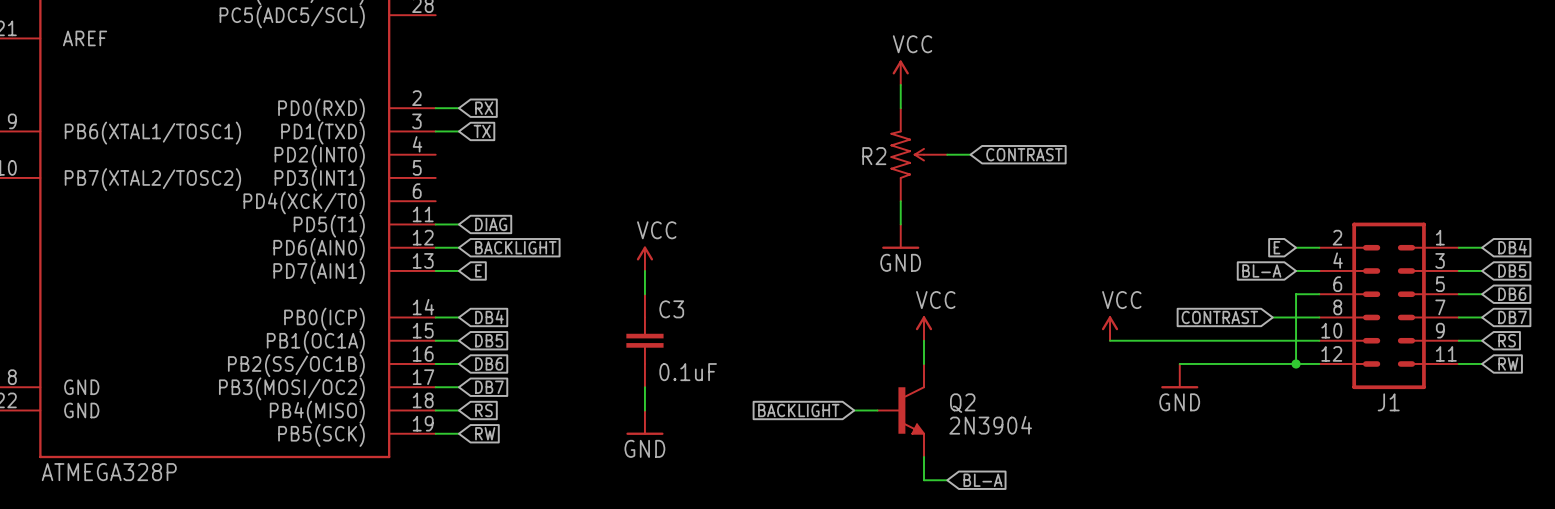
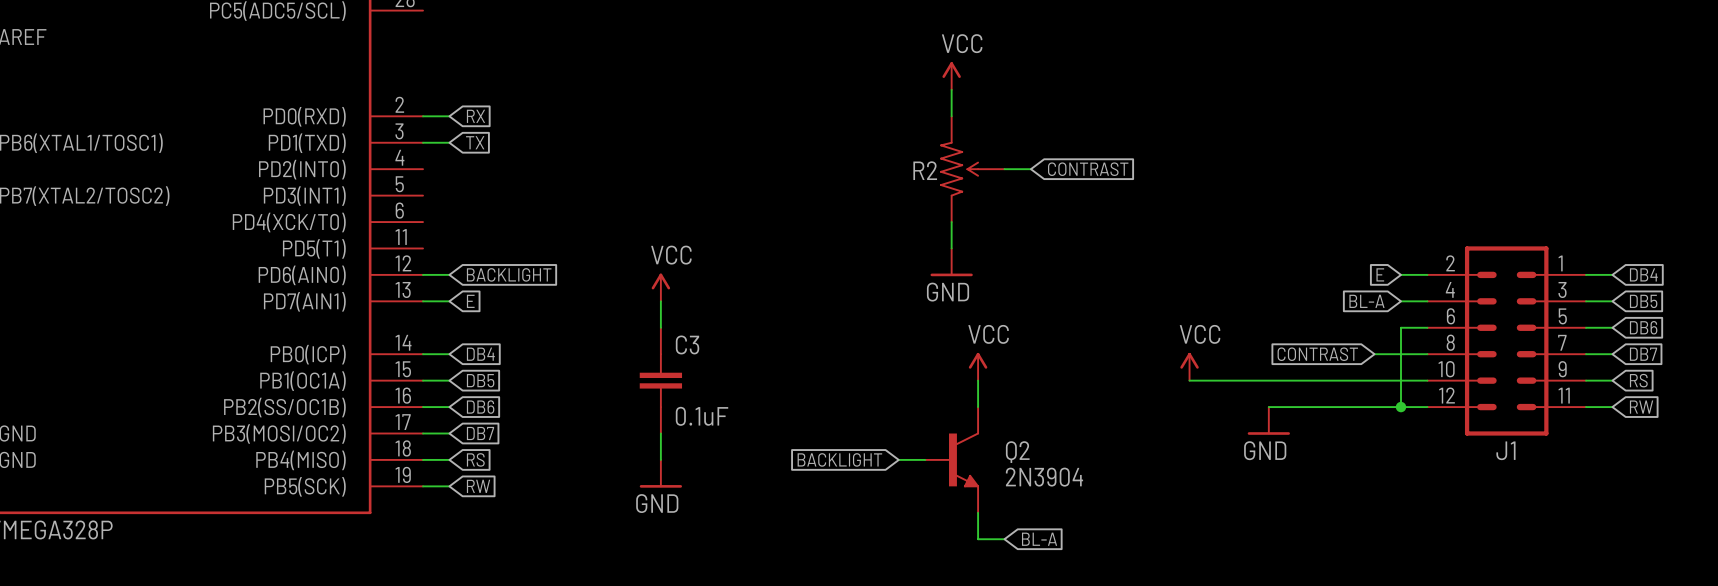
wire: (435, 224) (458, 224) -> none
global label: DIAG (491, 224) -> none

